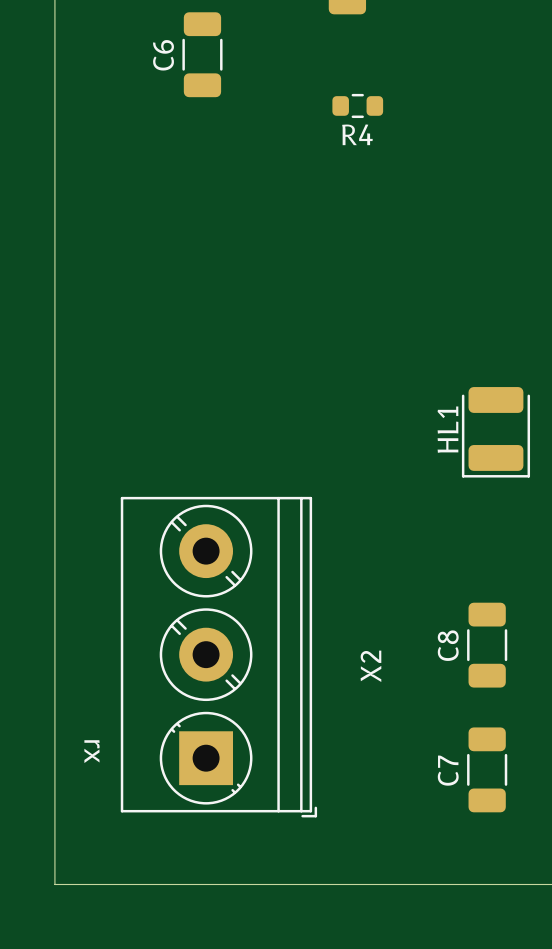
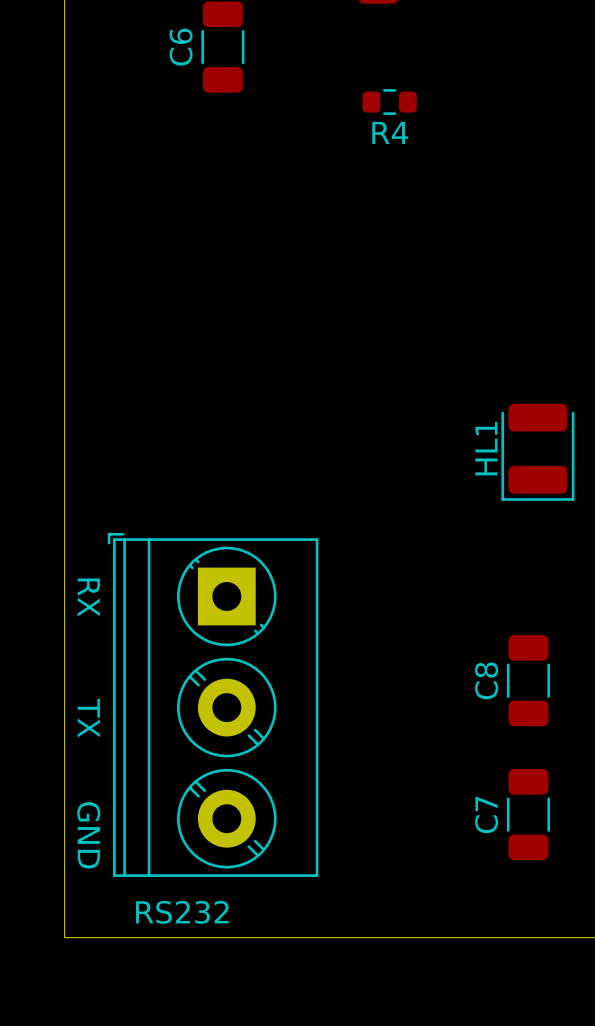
text: none -> RX (88, 597)
X2: (218, 657) -> none
RS232: none -> (213, 704)
text: none -> TX (88, 718)
text: rx (92, 751) -> none
text: none -> GND (88, 835)

